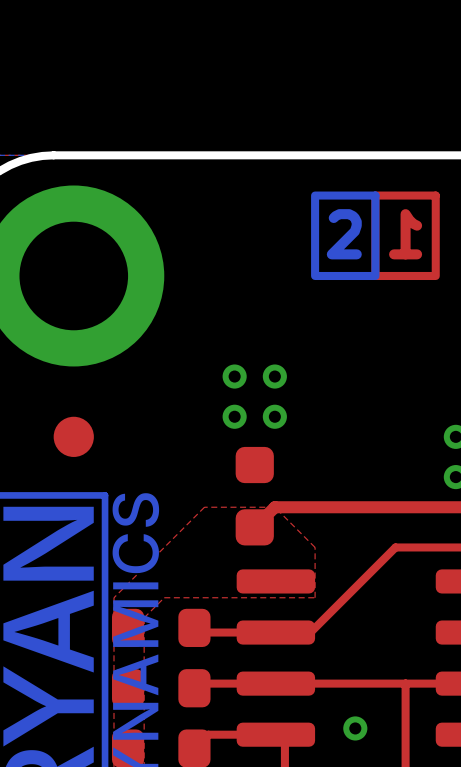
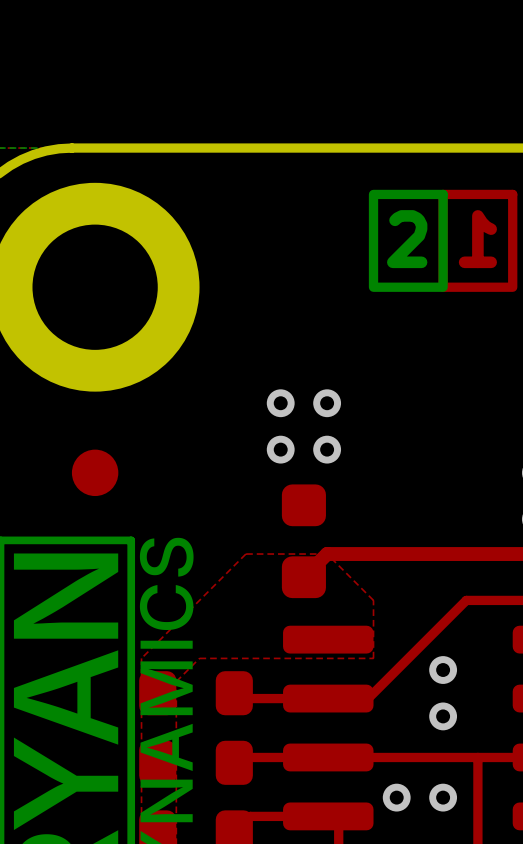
via: none -> (443, 670)
via: none -> (443, 716)
via: none -> (396, 797)
via: none -> (443, 797)
via: (355, 728) -> none

